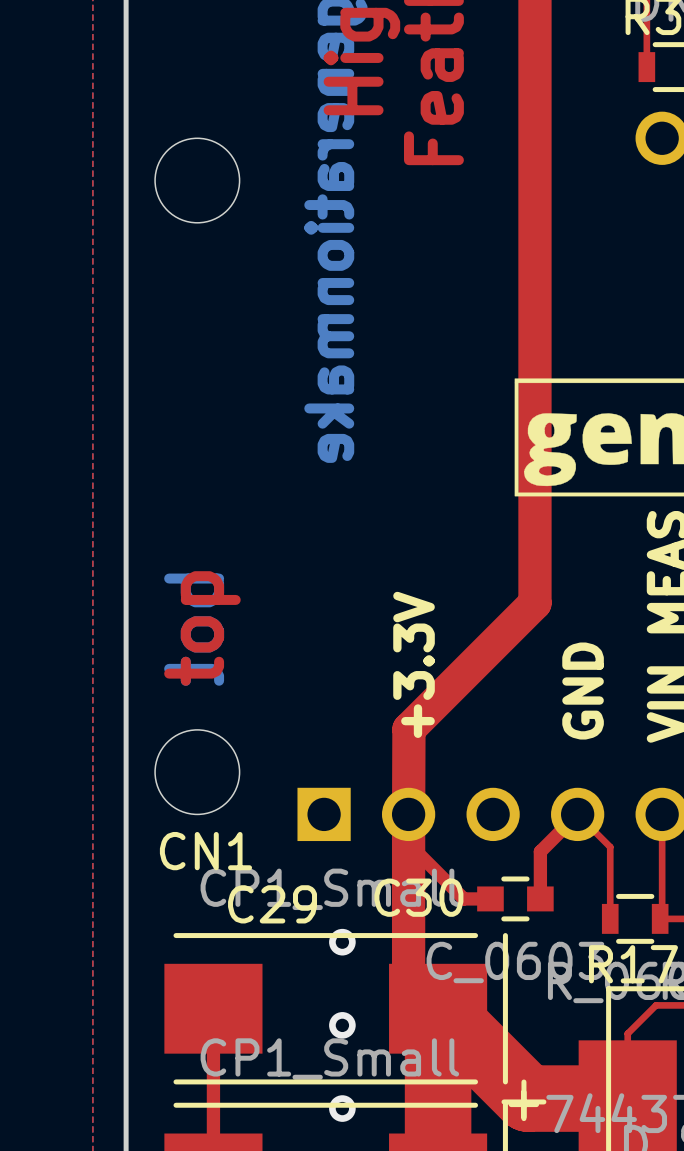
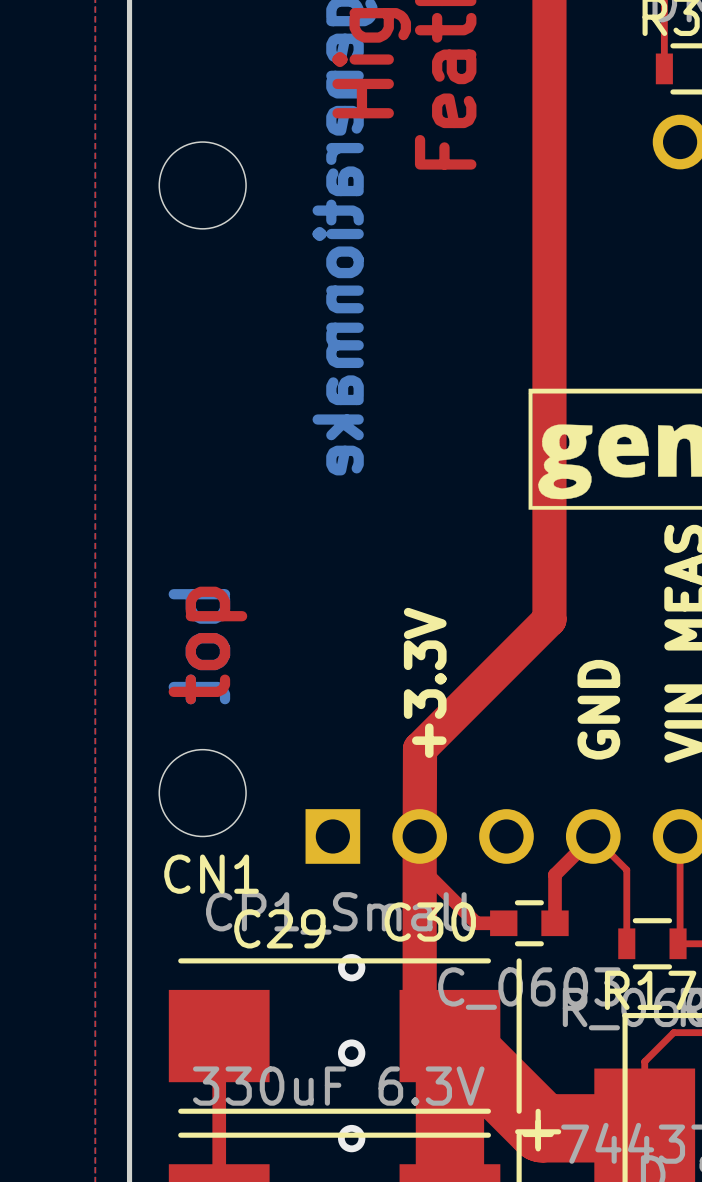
part value: CP1_Small (329, 1059) -> 330uF 6.3V (338, 1086)

